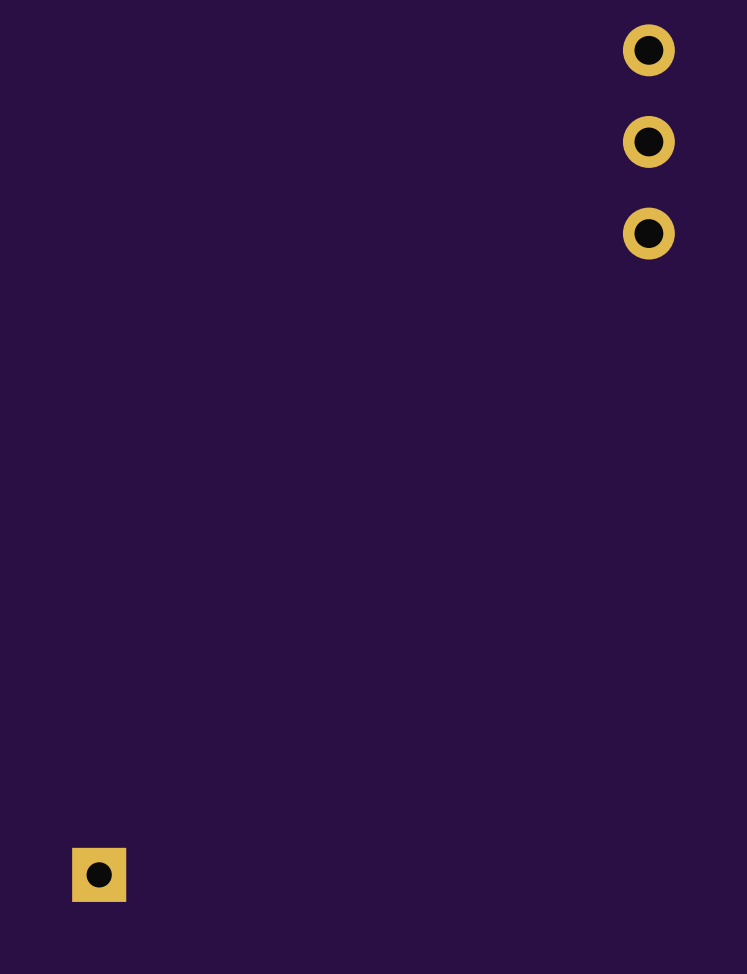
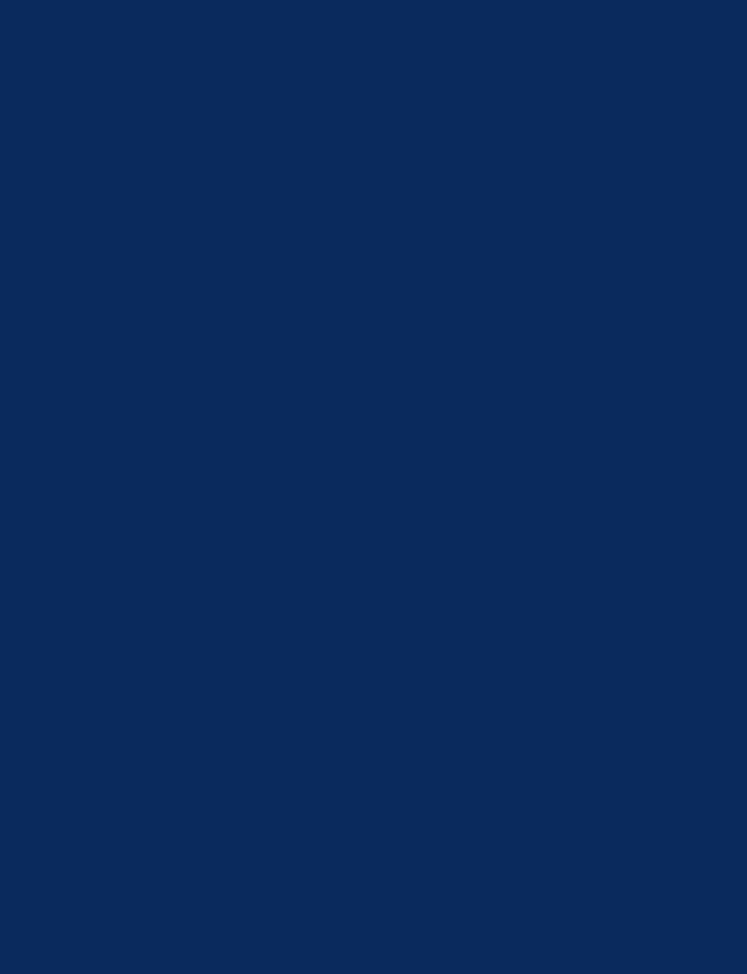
part: (648, 141) -> none
part: (99, 874) -> none

